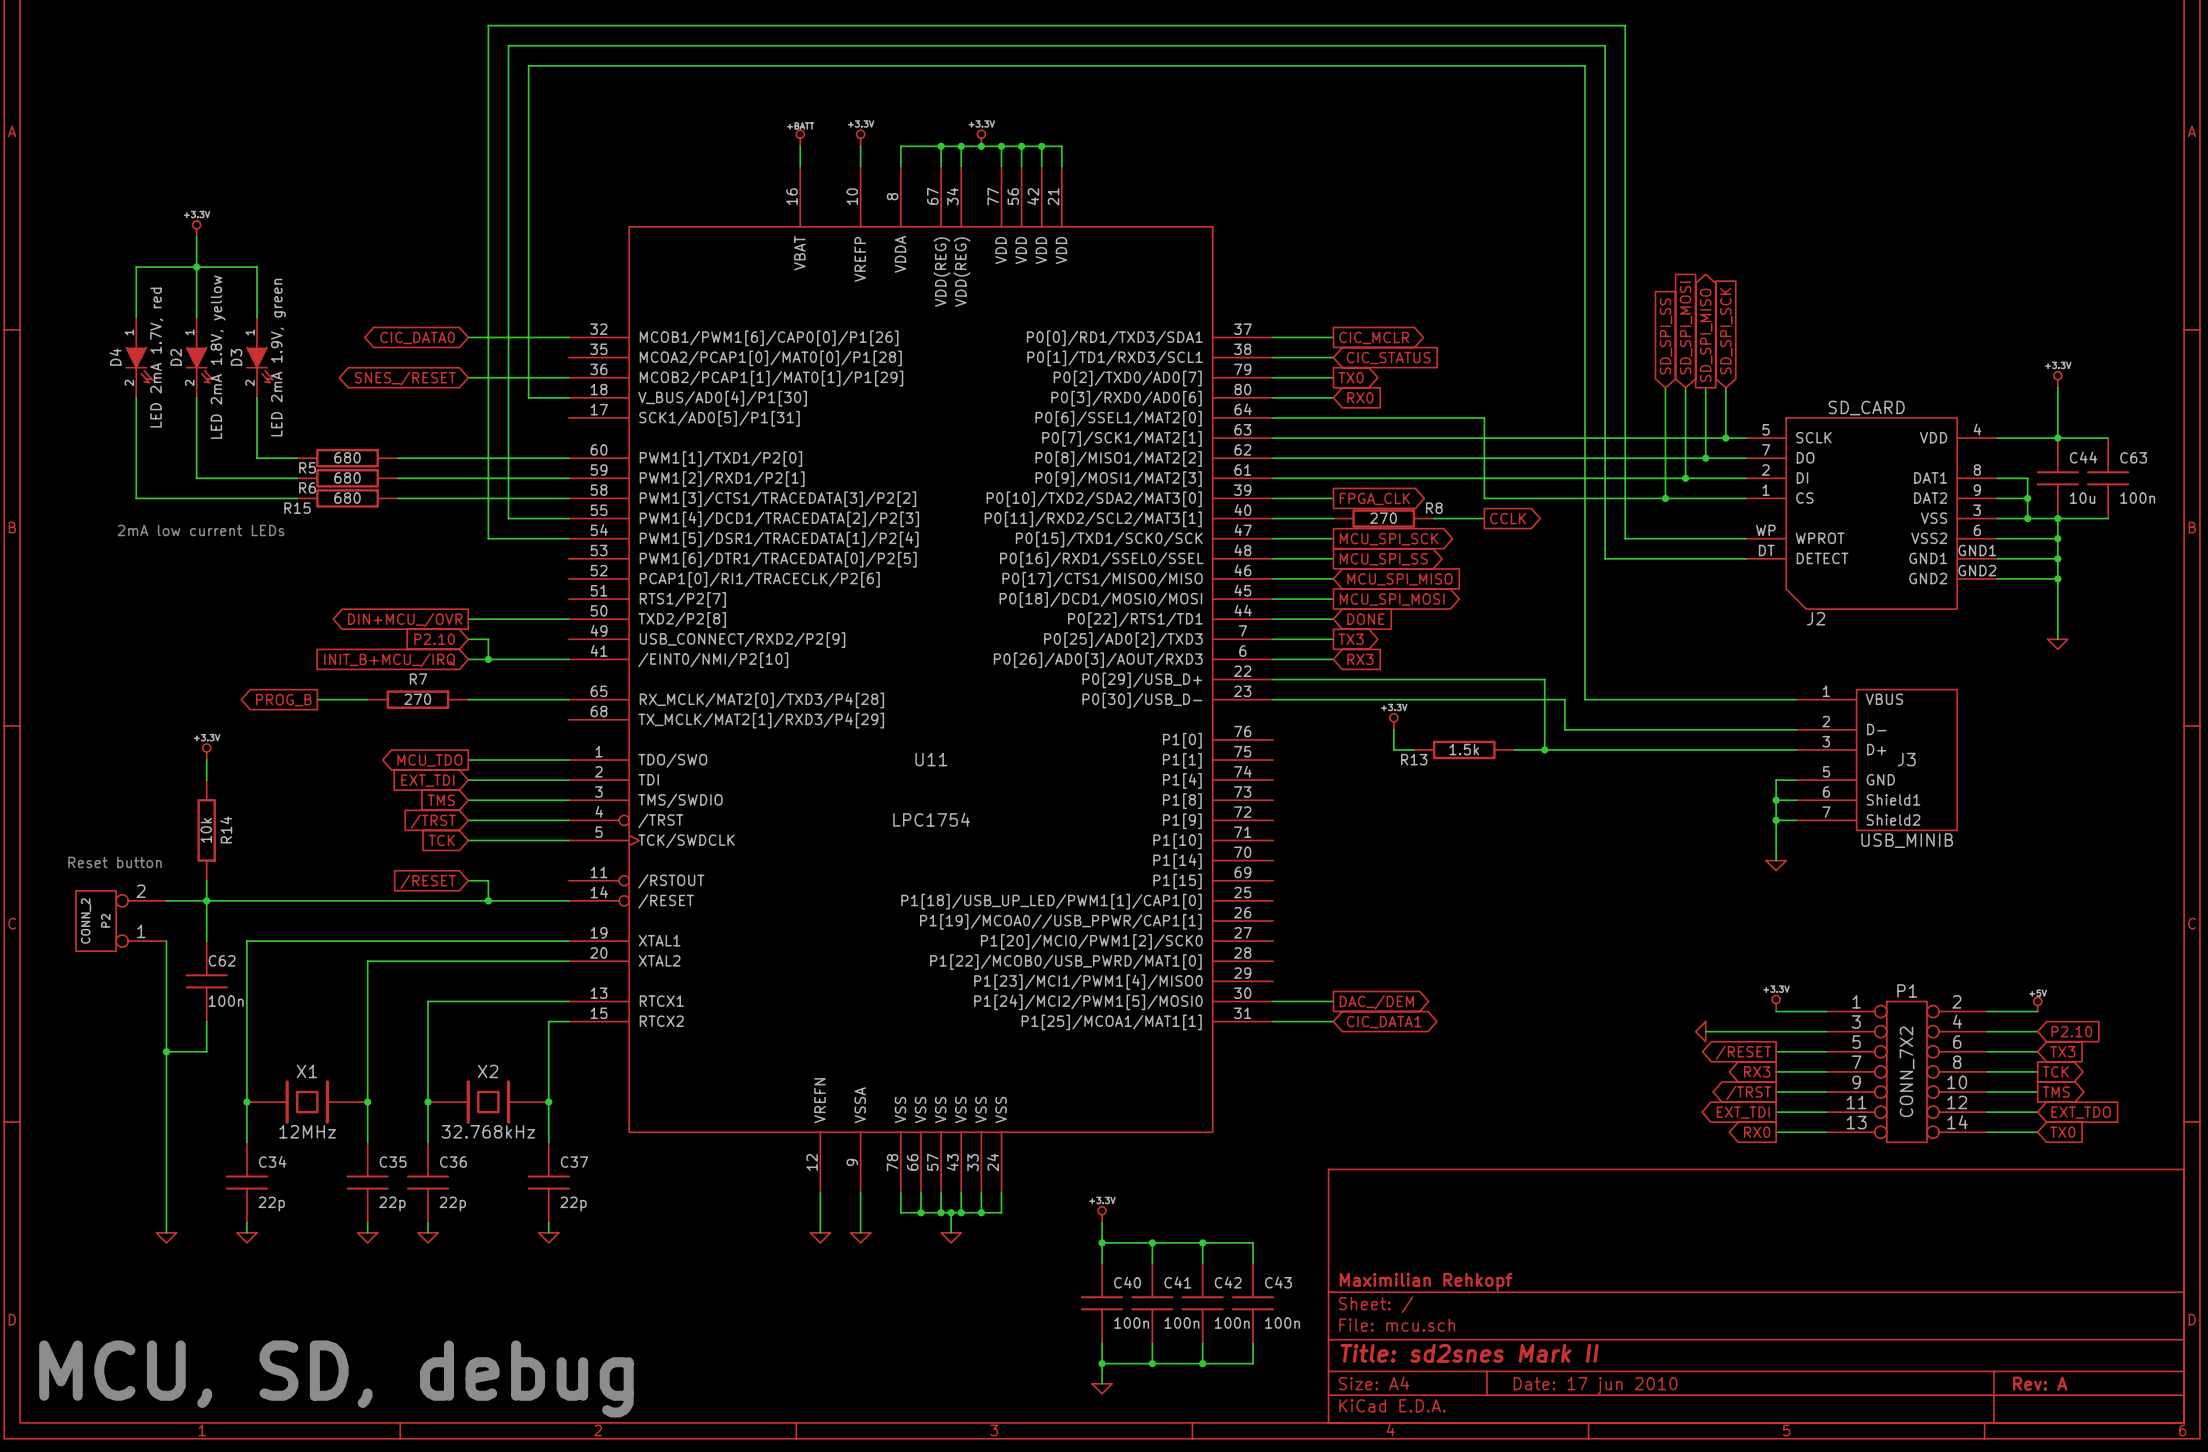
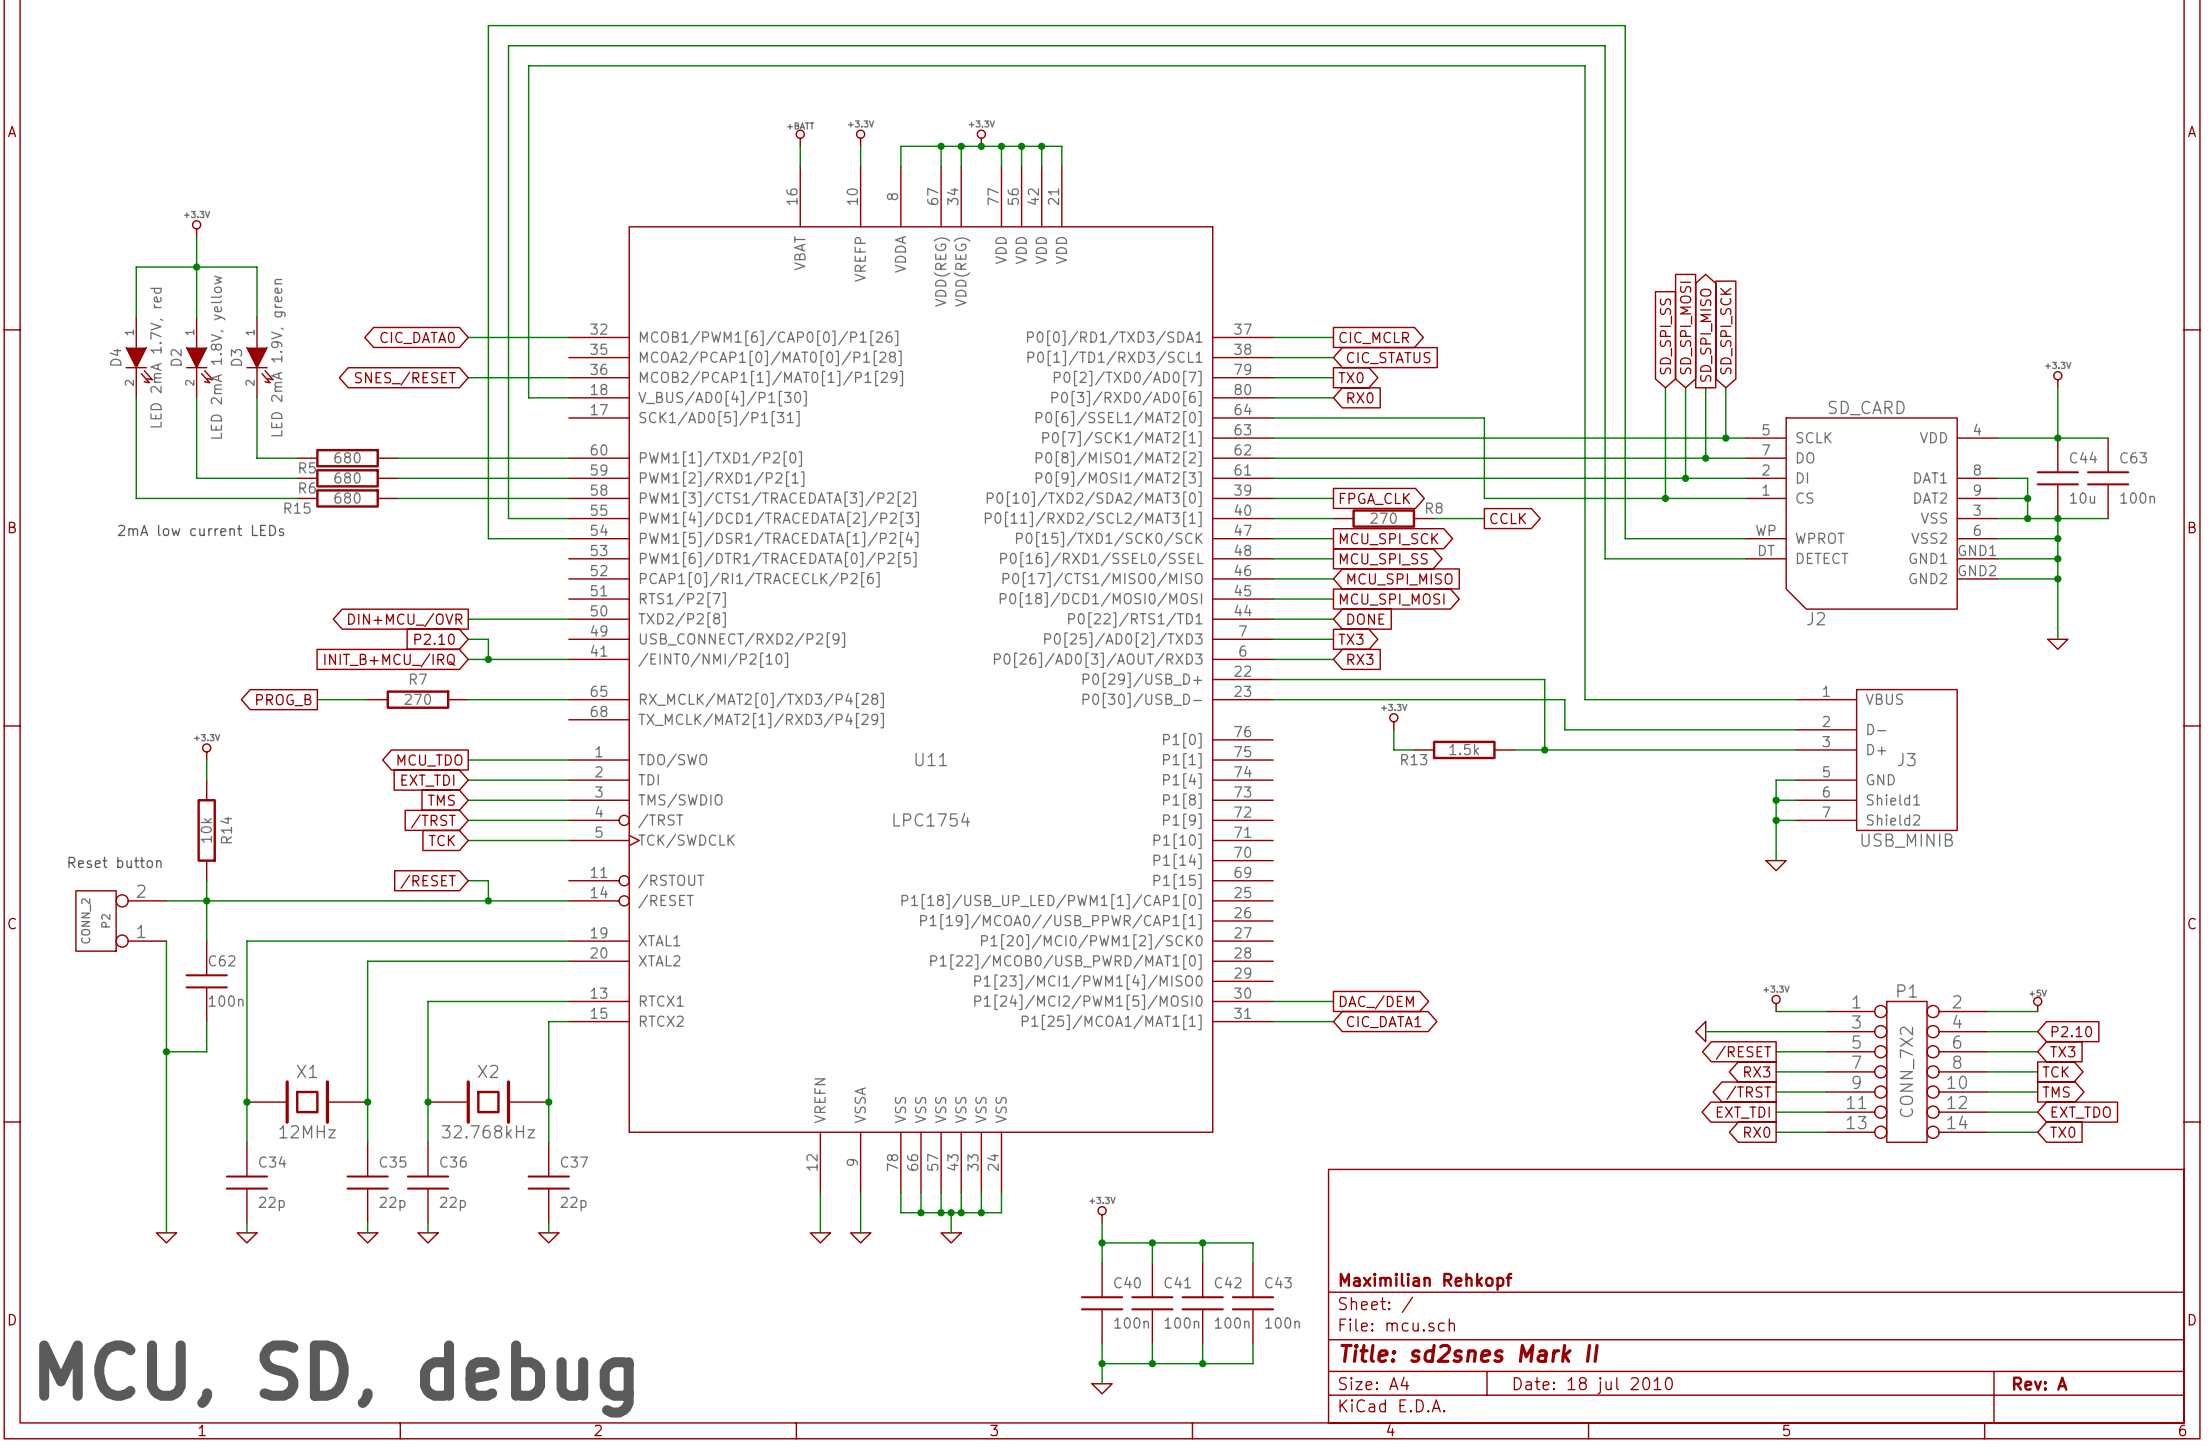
title block: Date: 17 jun 2010 (1595, 1385) -> Date: 18 jul 2010 (1593, 1385)

